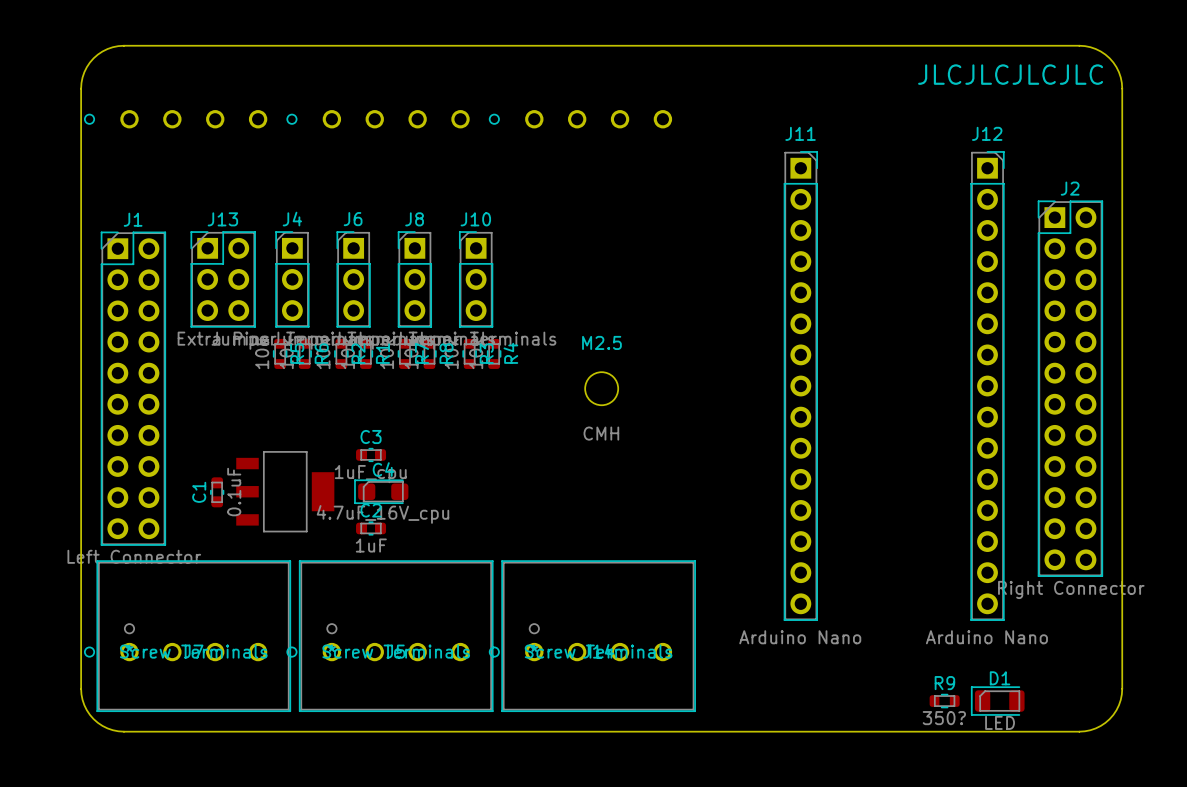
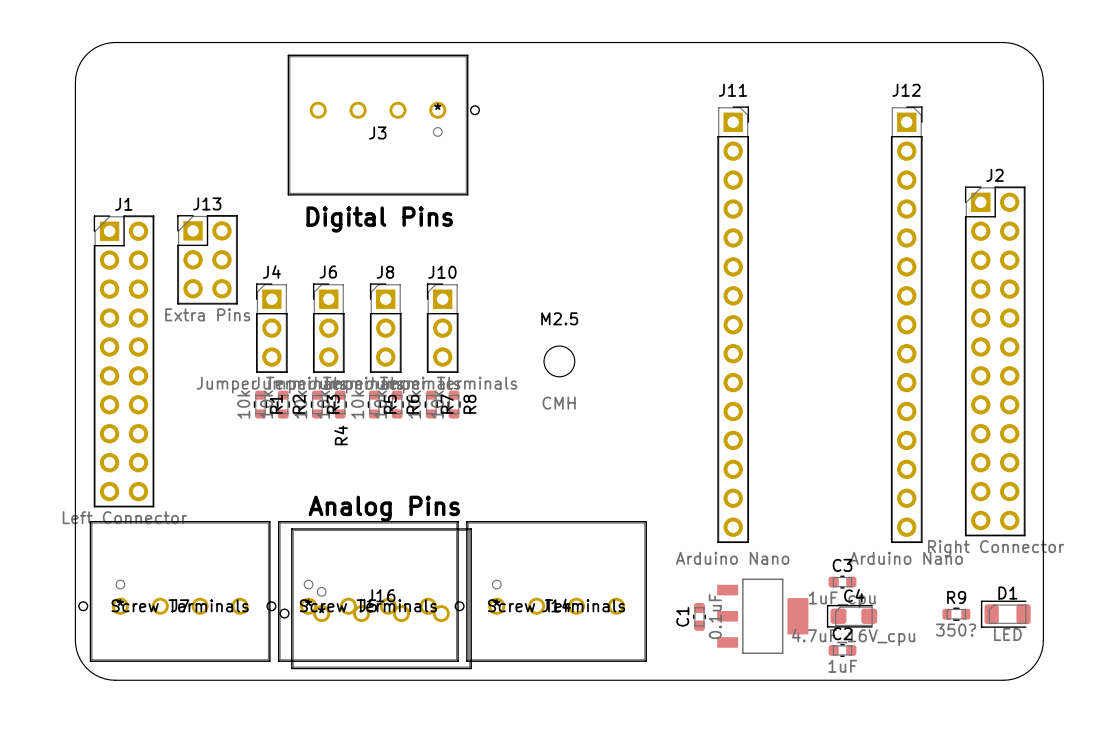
text: JLCJLCJLCJLC (1010, 74) -> none
part: (175, 119) -> none
J3 side: bottom (378, 119) -> top (383, 125)
part: (580, 119) -> none
text: none -> Digital Pins (379, 219)
J4 position: (292, 279) -> (271, 328)
J6 position: (353, 279) -> (328, 328)
J8 position: (414, 279) -> (385, 328)
J10 position: (476, 279) -> (442, 328)
R5 position: (280, 353) -> (374, 404)
R6 position: (304, 353) -> (397, 404)
R2 position: (341, 353) -> (283, 404)
R1 position: (365, 353) -> (260, 404)
R7 position: (404, 353) -> (431, 404)
R8 position: (429, 353) -> (454, 404)
R3 position: (469, 353) -> (317, 404)
R4 position: (494, 353) -> (340, 404)
R4 name position: R4 (510, 353) -> R4 (341, 435)
J11 position: (800, 386) -> (733, 324)
J12 position: (987, 386) -> (906, 324)
C3 position: (371, 454) -> (842, 582)
part: (285, 491) -> none
C4 position: (381, 491) -> (852, 616)
C1 position: (217, 492) -> (699, 616)
C2 position: (371, 528) -> (842, 650)
text: none -> Analog Pins (384, 508)
J16: none -> (375, 598)
part: none -> (762, 616)
R9 position: (944, 701) -> (956, 614)
D1 position: (997, 701) -> (1005, 614)

